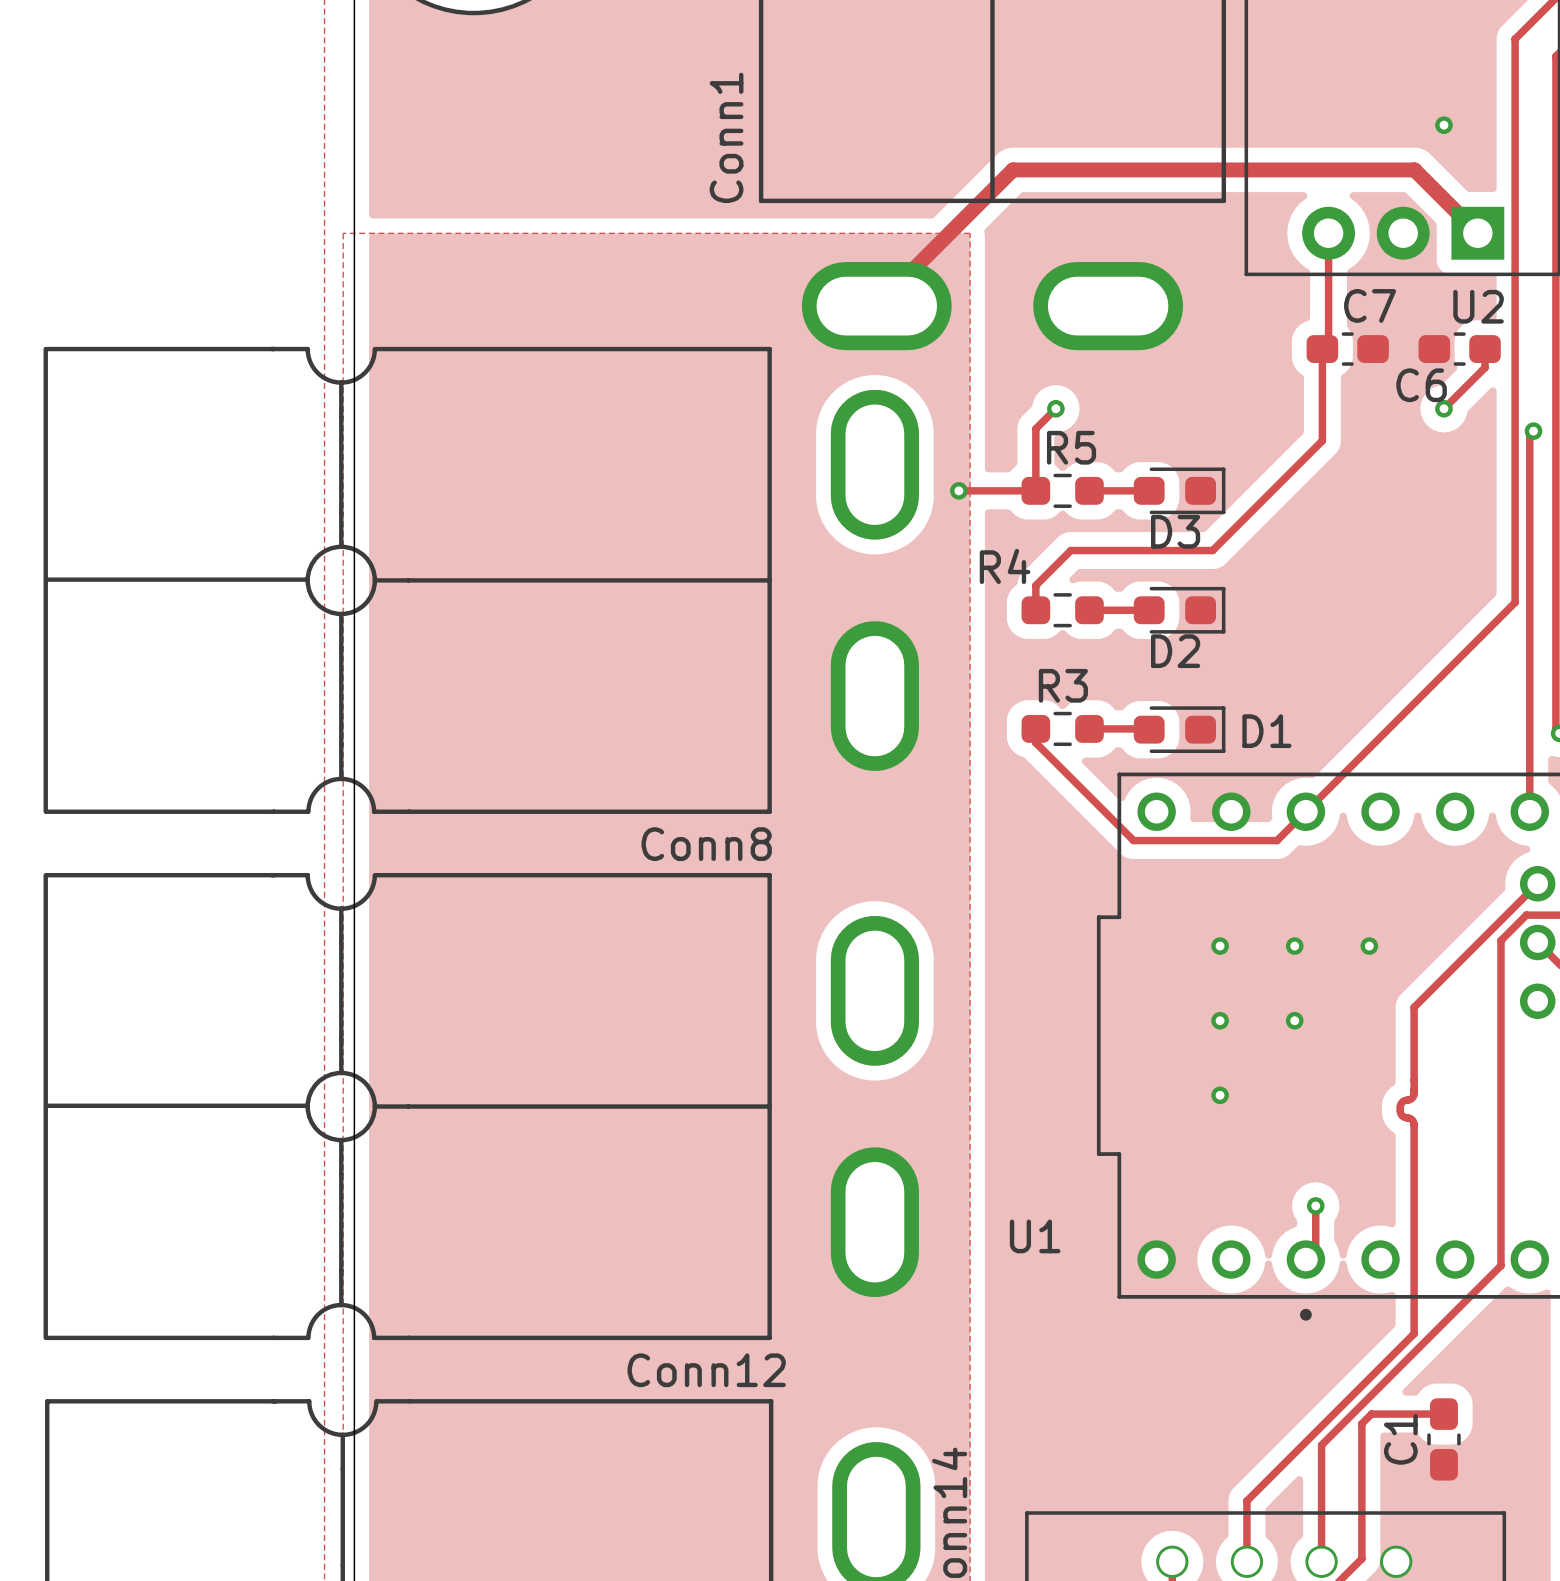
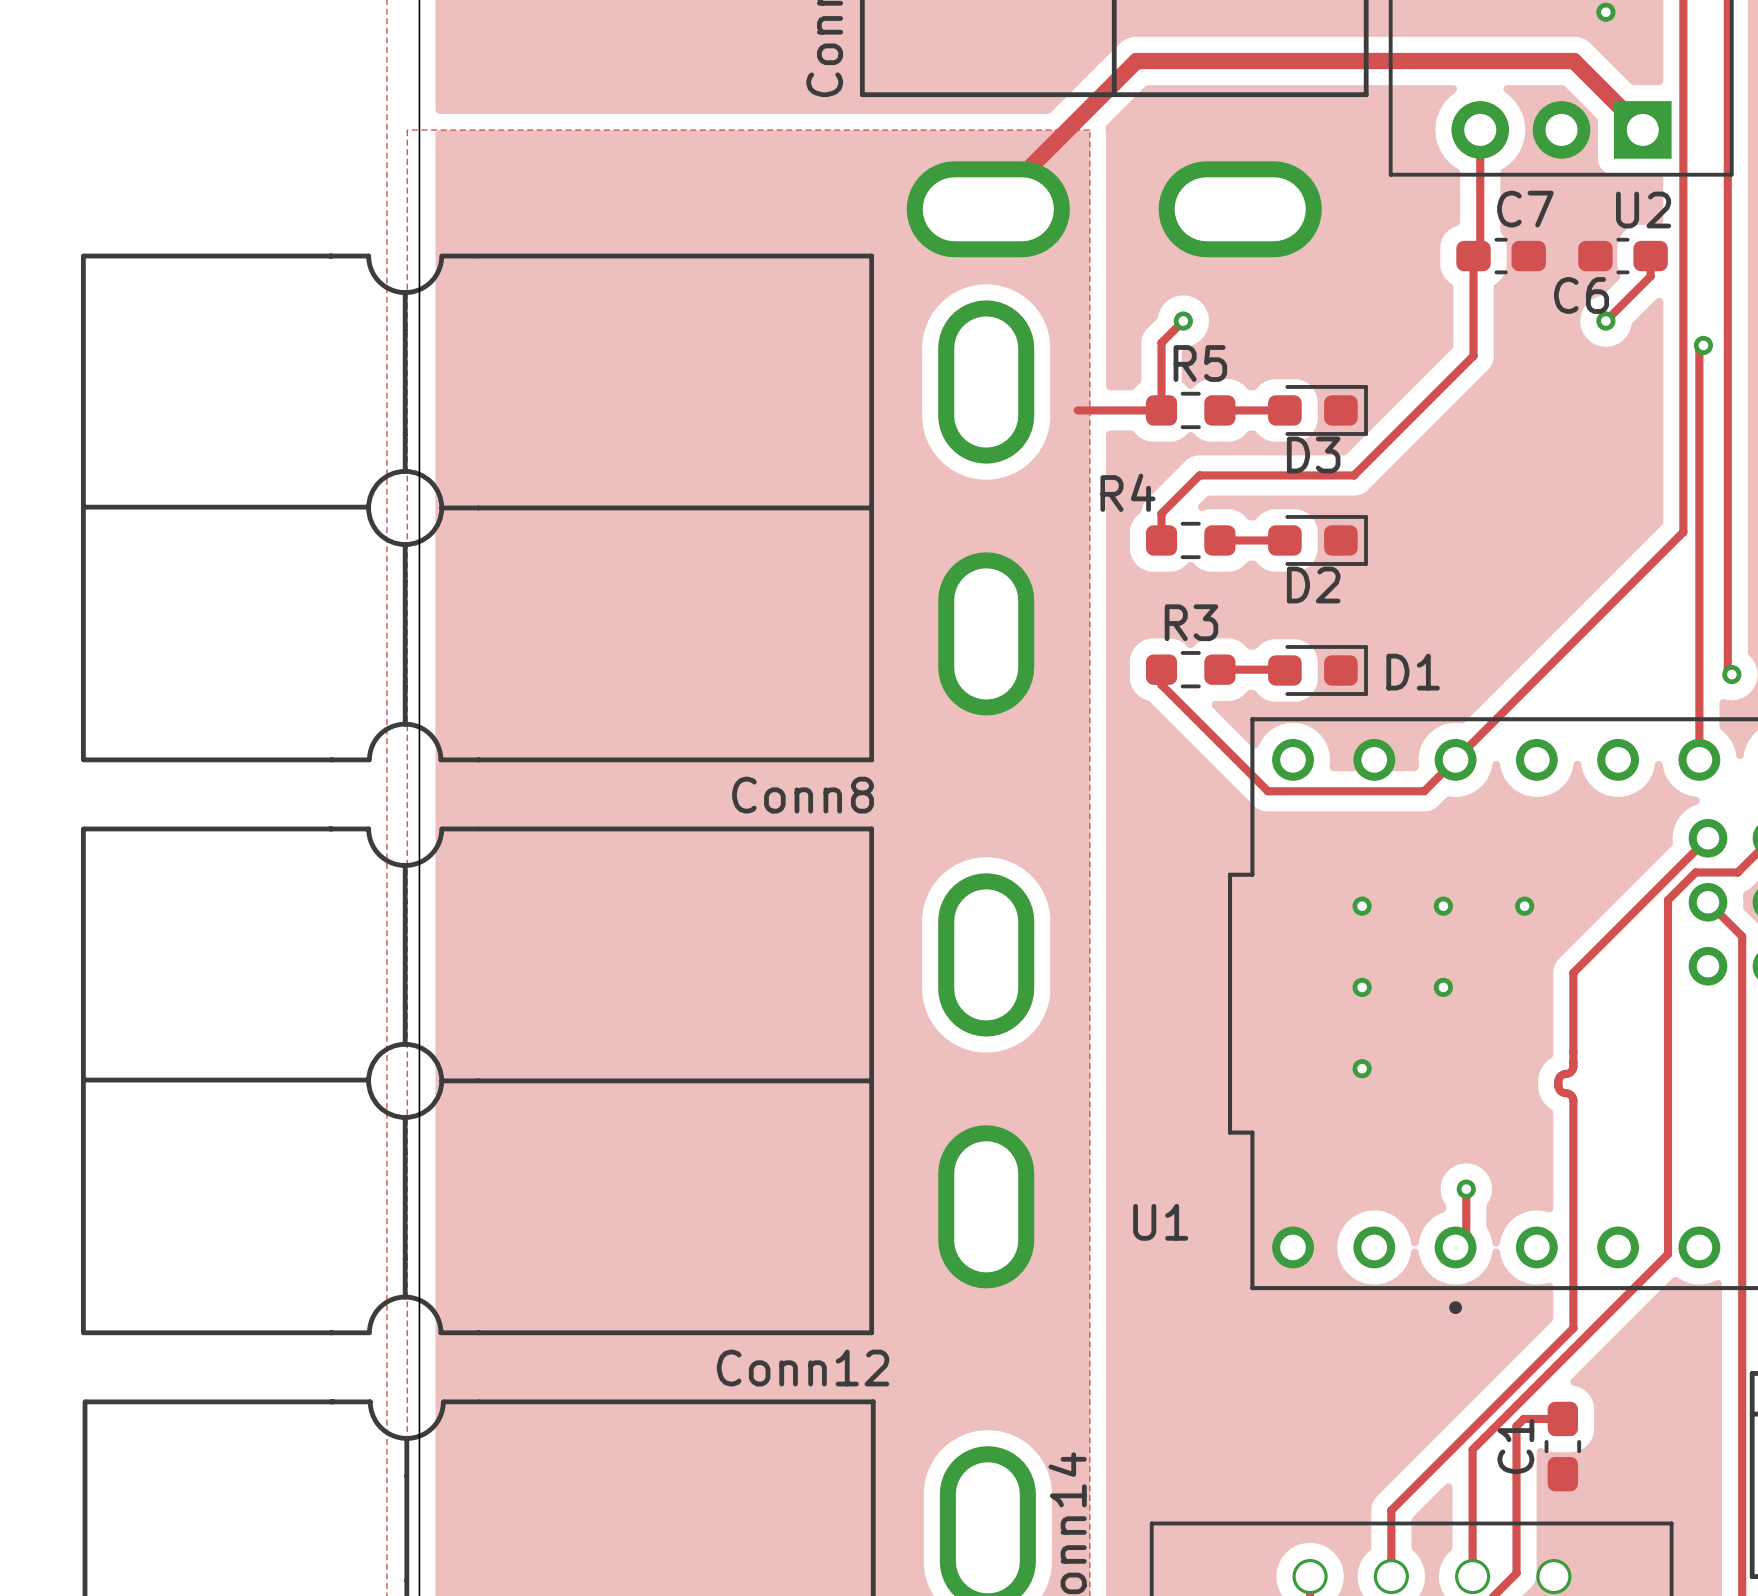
via: (958, 490) -> none
track: (1443, 1414) (1371, 1414) (1368, 1417) -> (1562, 1418) (1523, 1418)
C1 position: (1443, 1439) -> (1562, 1446)

